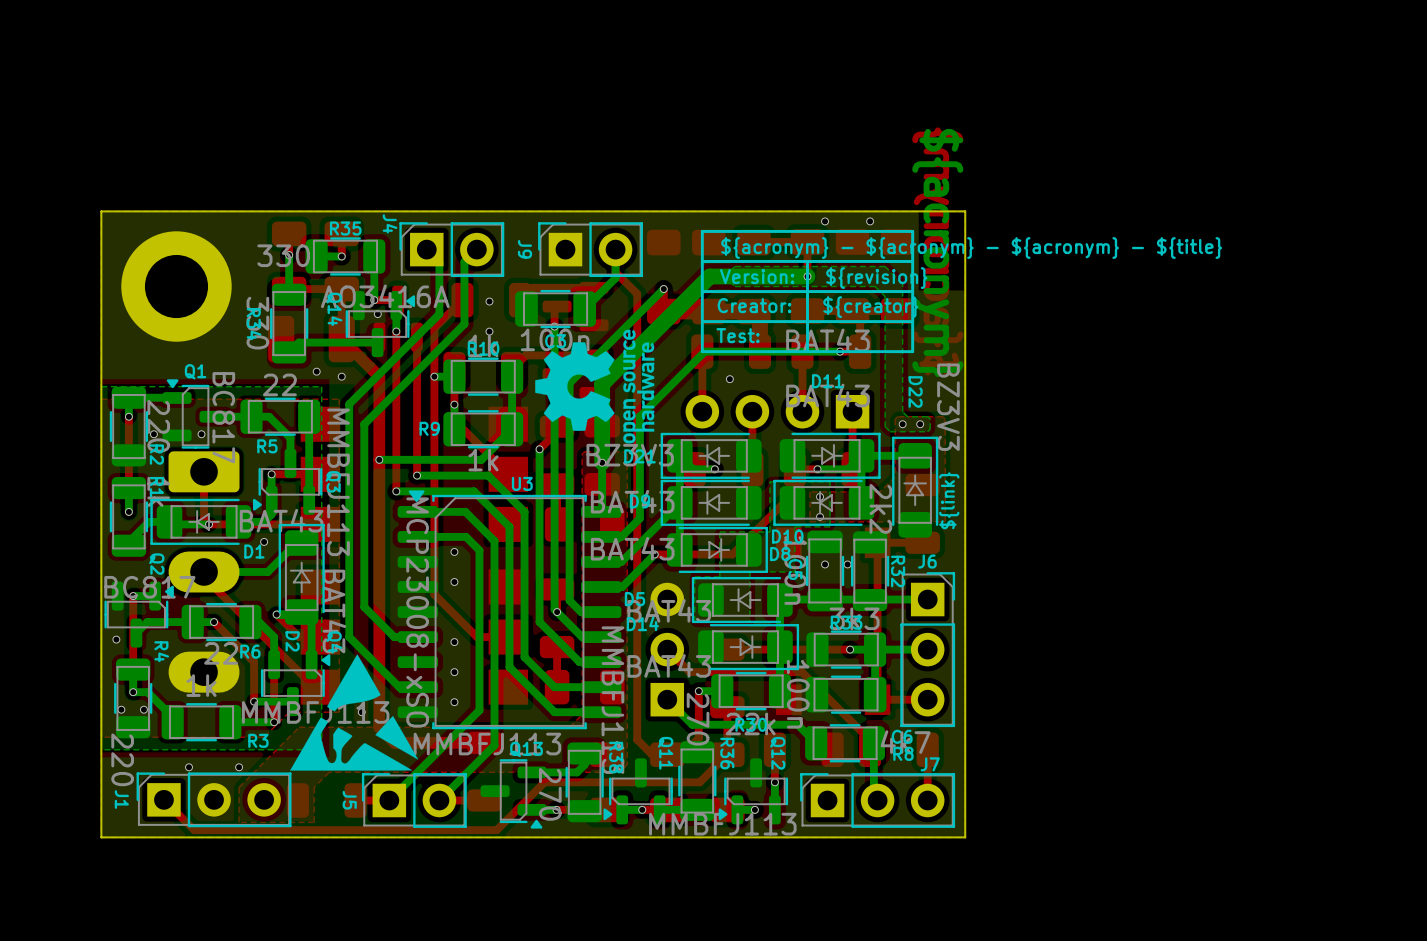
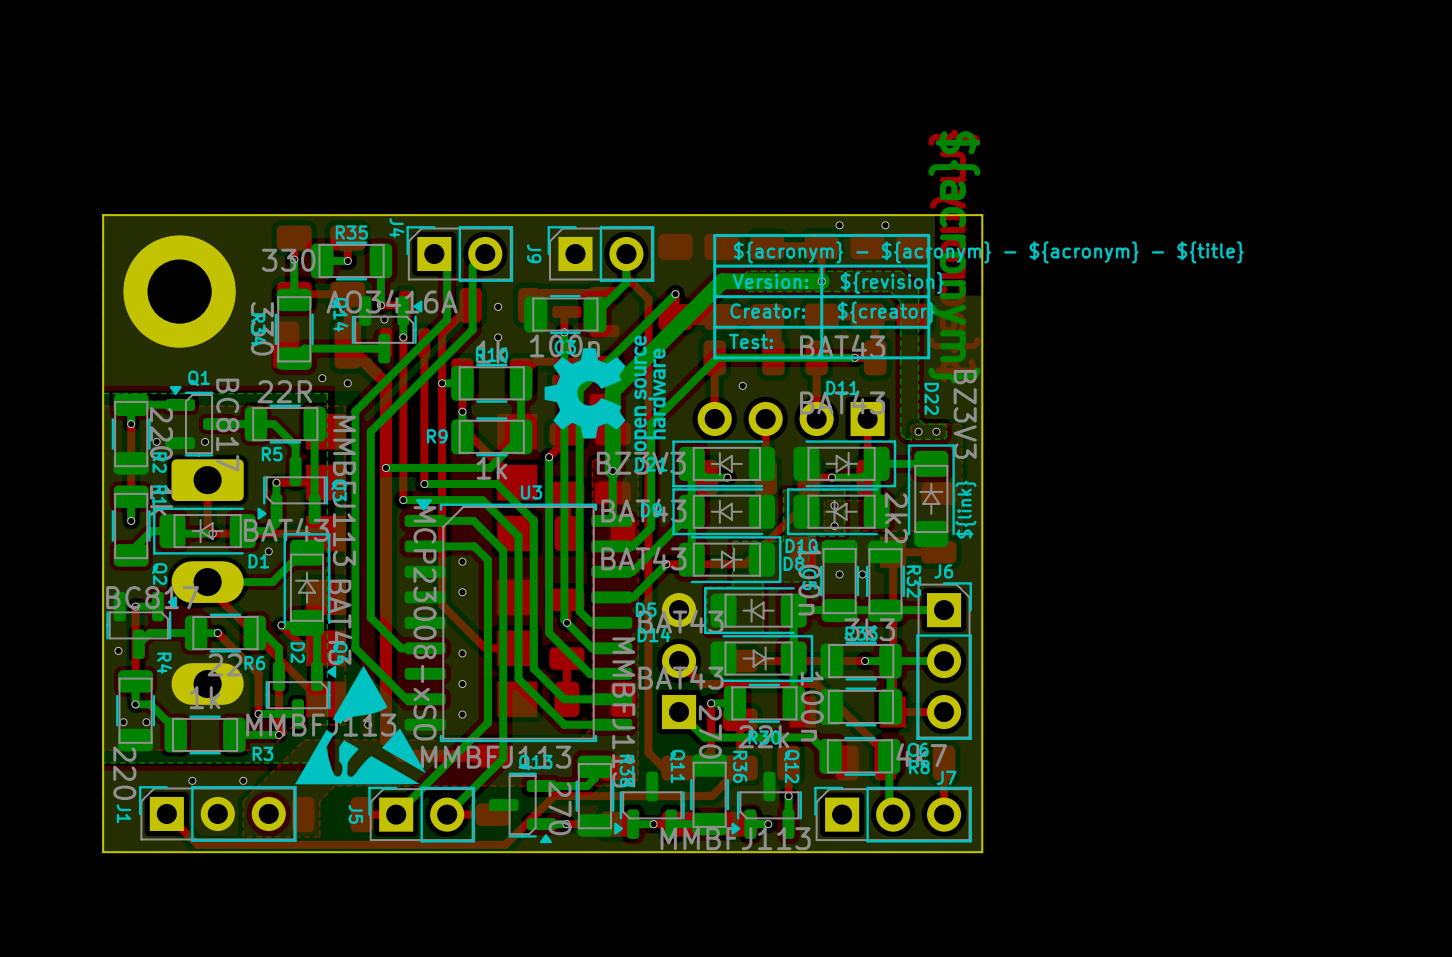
R5 value: 22 (279, 384) -> 22R (284, 391)

